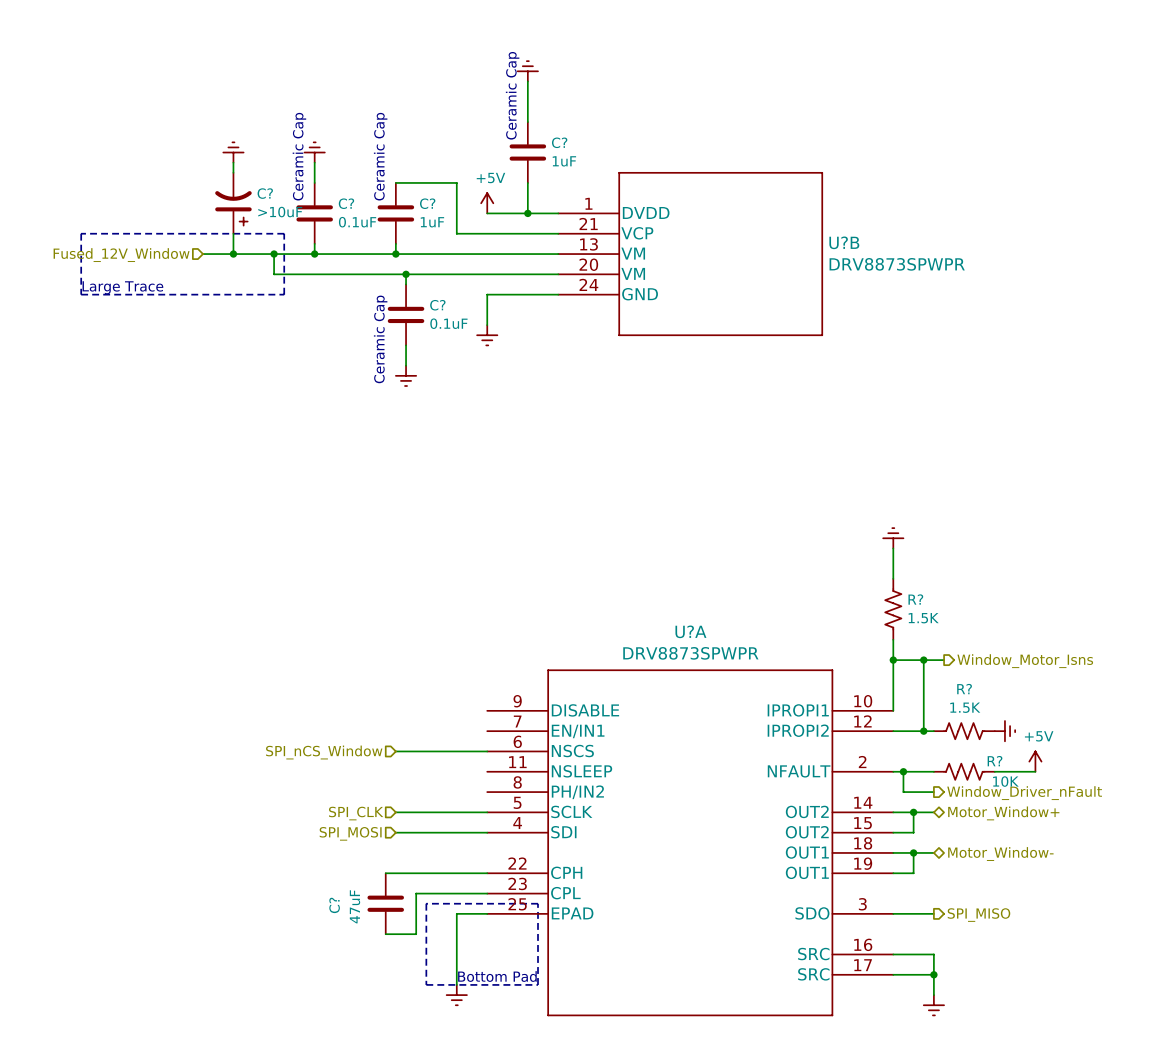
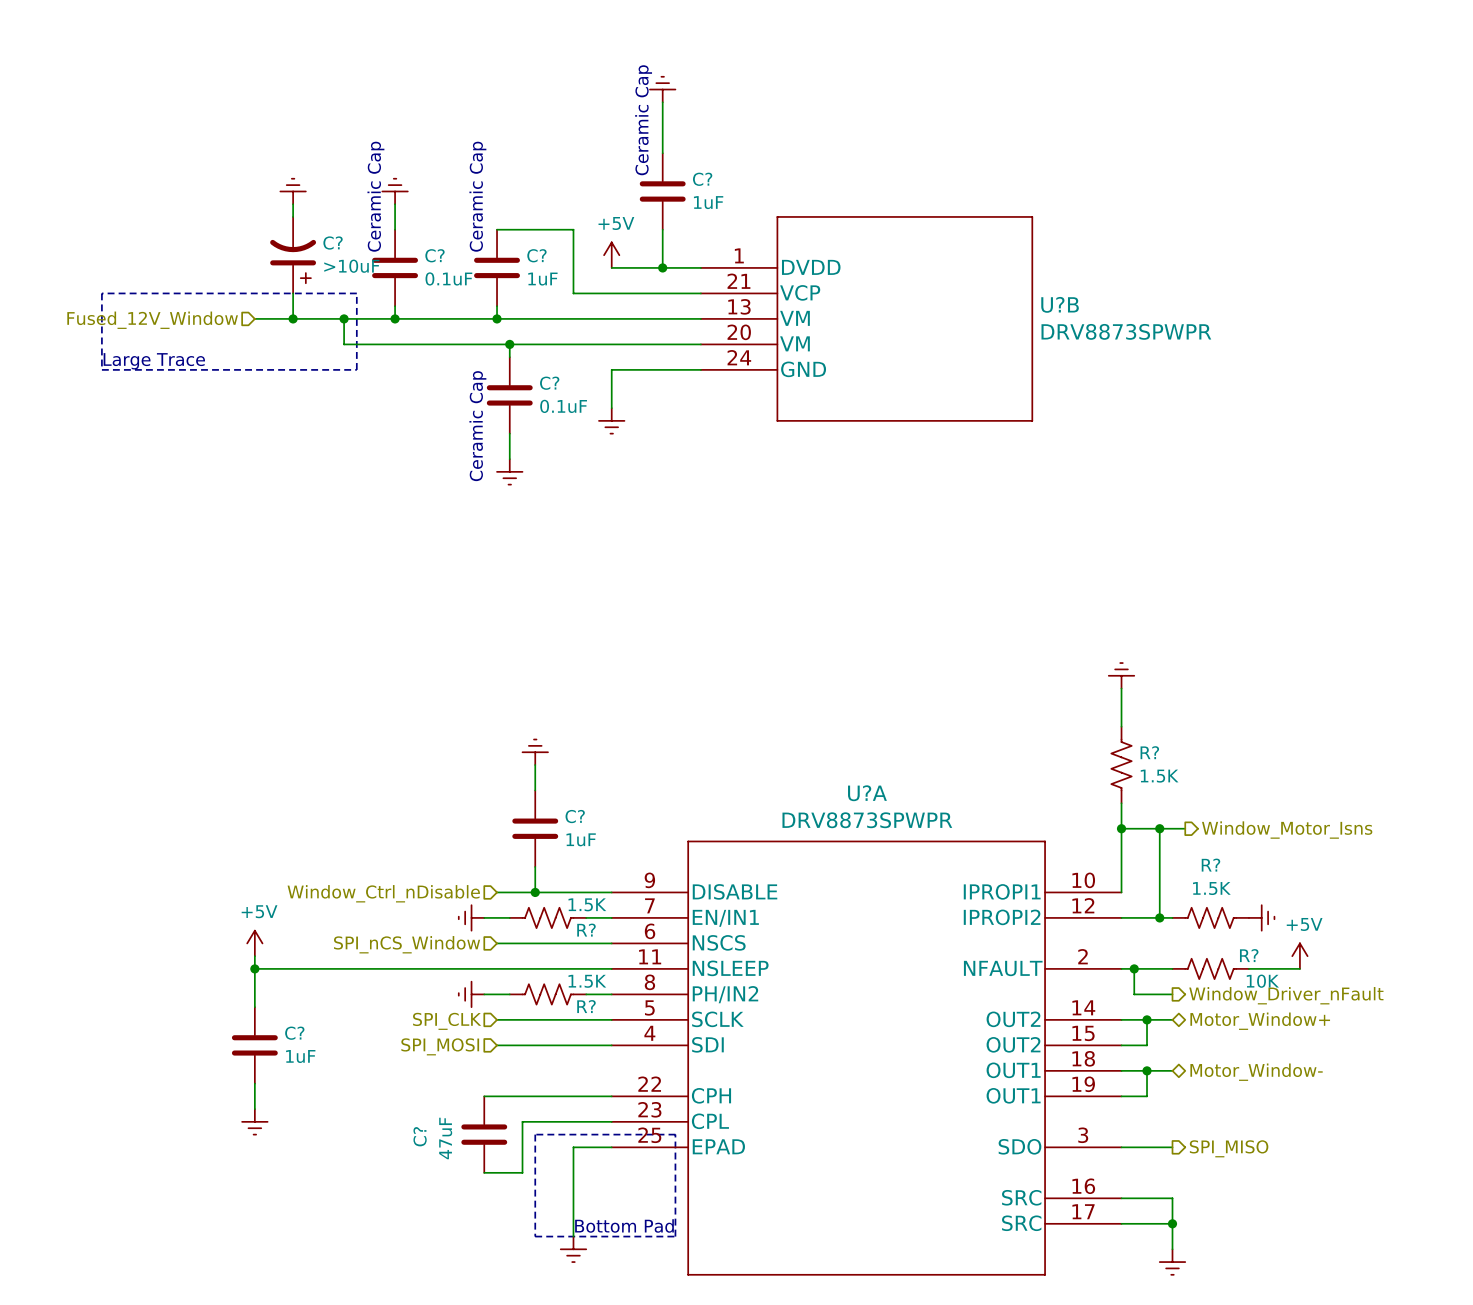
power symbol: none -> (535, 752)
wire: none -> (535, 765) (535, 790)
C?: none -> 1uF (535, 828)
wire: none -> (535, 866) (535, 892)
wire: none -> (497, 892) (611, 892)
junction: none -> (535, 892)
hierarchical label: none -> Window_Ctrl_nDisable (383, 893)
power symbol: none -> (471, 917)
wire: none -> (484, 917) (509, 917)
R?: none -> 1.5K (547, 917)
wire: none -> (586, 917) (611, 917)
power symbol: none -> +5V (254, 943)
wire: none -> (254, 956) (254, 1007)
wire: none -> (254, 968) (611, 968)
junction: none -> (254, 968)
power symbol: none -> (471, 994)
wire: none -> (484, 994) (509, 994)
R?: none -> 1.5K (547, 994)
wire: none -> (586, 994) (611, 994)
C?: none -> 1uF (254, 1045)
wire: none -> (254, 1083) (254, 1109)
power symbol: none -> (254, 1121)

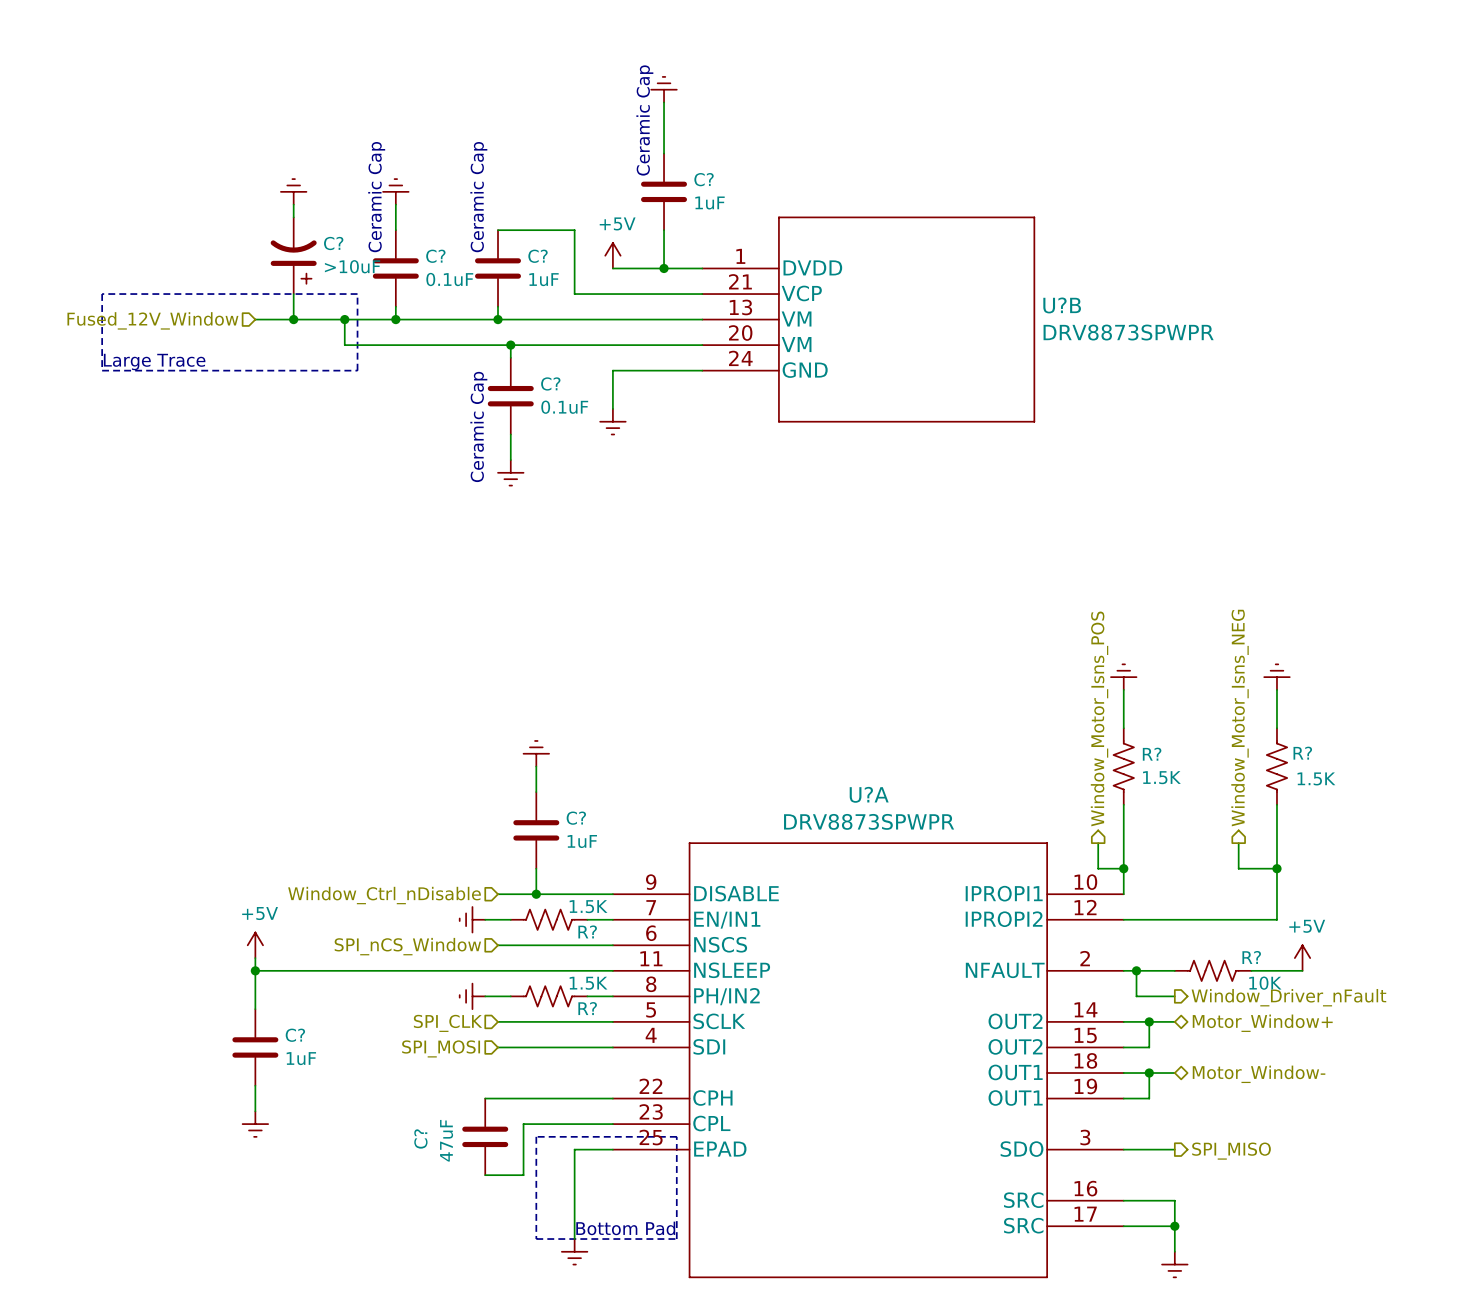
wire: none -> (1276, 689) (1276, 728)
hierarchical label: none -> Window_Motor_Isns_POS (1099, 718)
wire: none -> (1276, 804) (1276, 919) (1174, 919)
wire: (1121, 828) (1185, 828) -> none
junction: (1121, 828) -> none
wire: (1159, 828) (1159, 917) -> none
junction: (1159, 828) -> none
hierarchical label: Window_Motor_Isns (1287, 830) -> Window_Motor_Isns_NEG (1239, 718)
wire: none -> (1098, 843) (1098, 868) (1123, 868)
wire: none -> (1238, 843) (1238, 868) (1276, 868)
R? name position: R? (1210, 865) -> R? (1302, 753)
junction: none -> (1123, 868)
junction: none -> (1276, 868)
junction: (1159, 917) -> none
R? rotation: 0° (1210, 917) -> 90° clockwise (1276, 766)
R? position: (1210, 917) -> (1276, 766)
power symbol rotation: 0° (1261, 917) -> 90° counterclockwise (1276, 677)
power symbol position: (1261, 917) -> (1276, 677)

